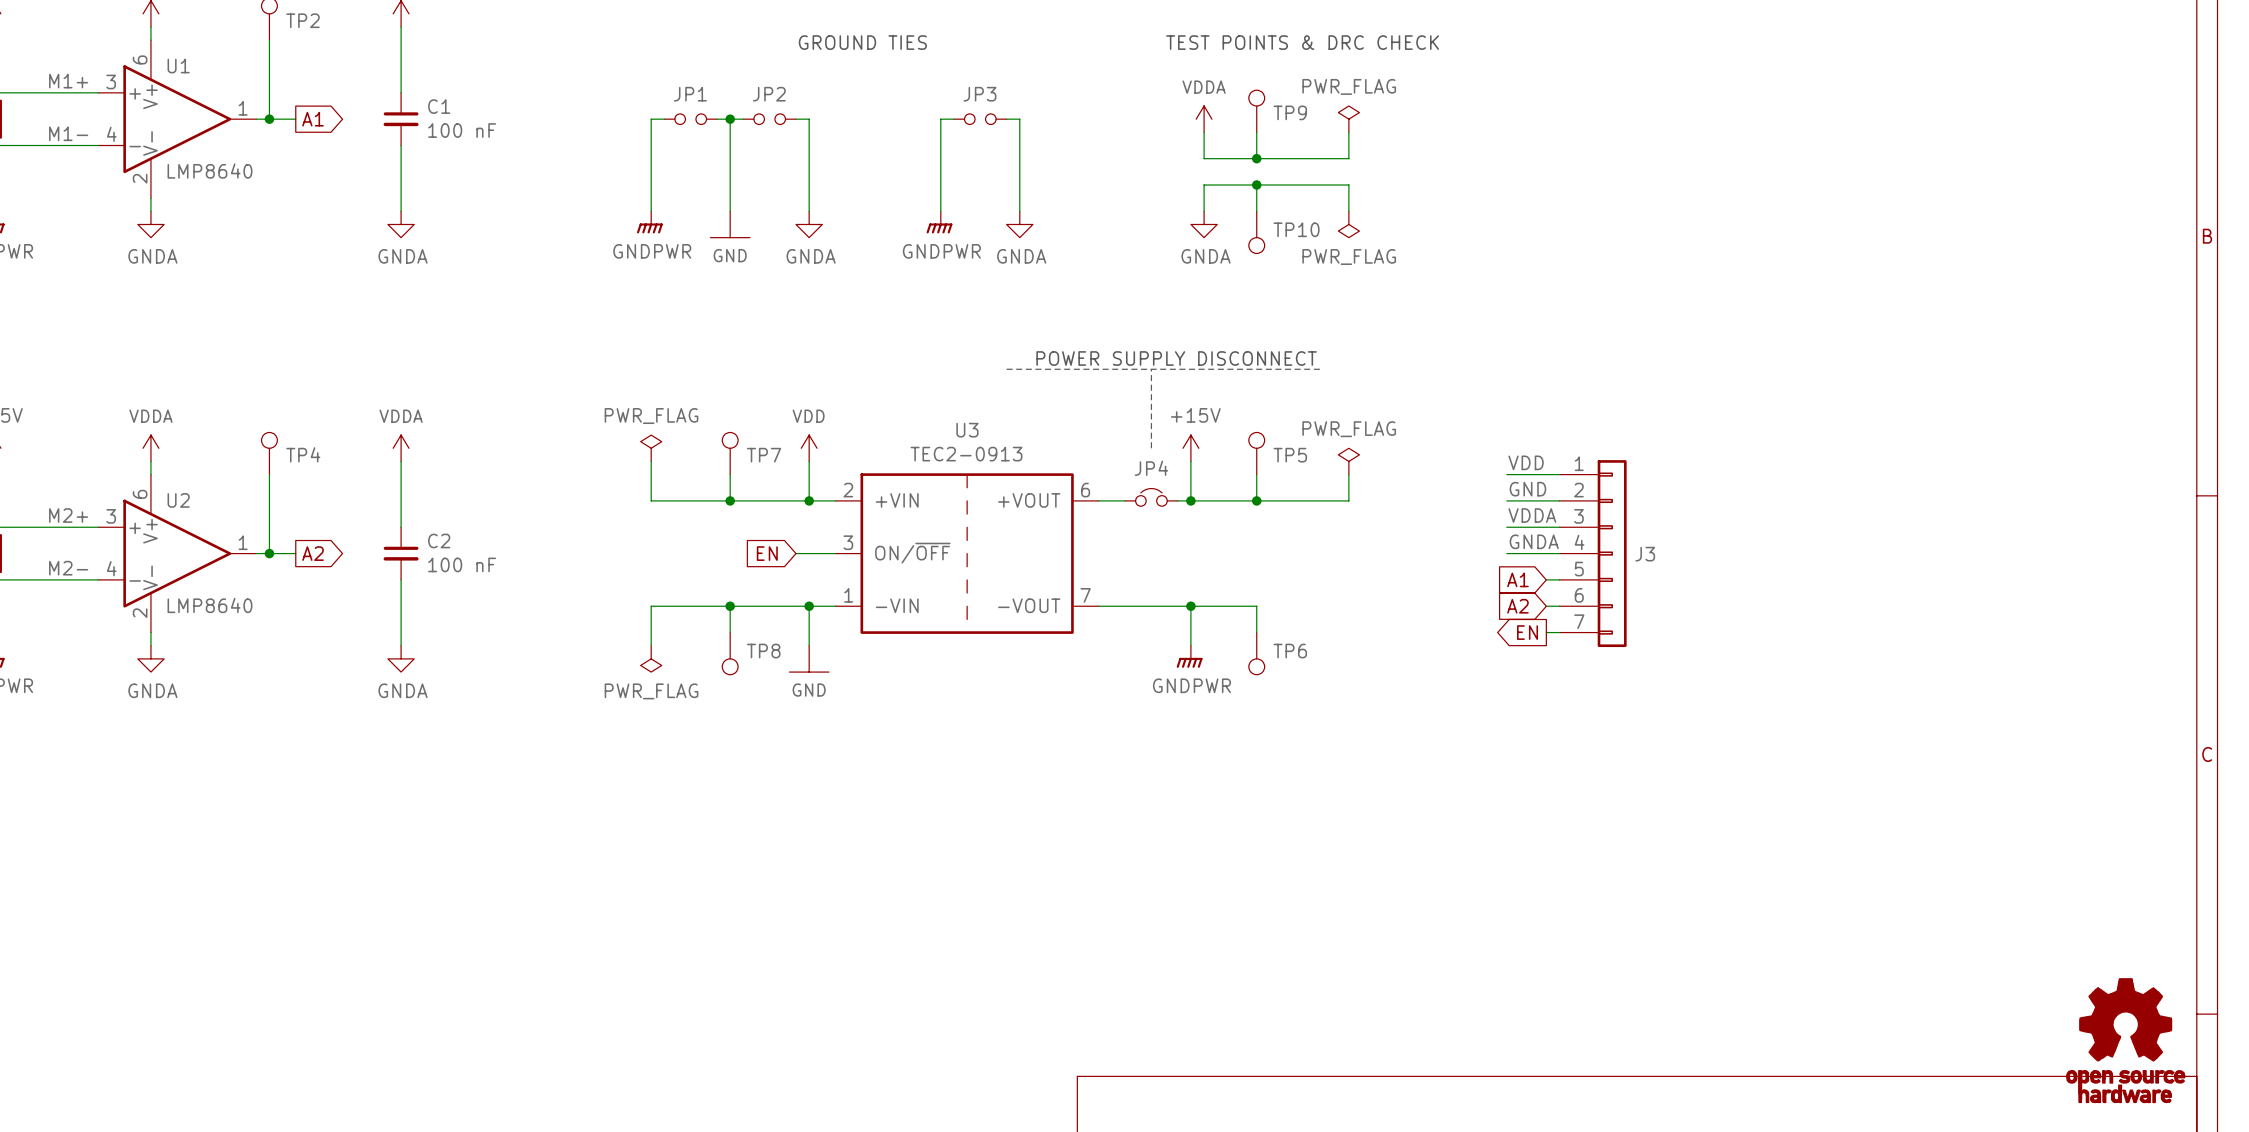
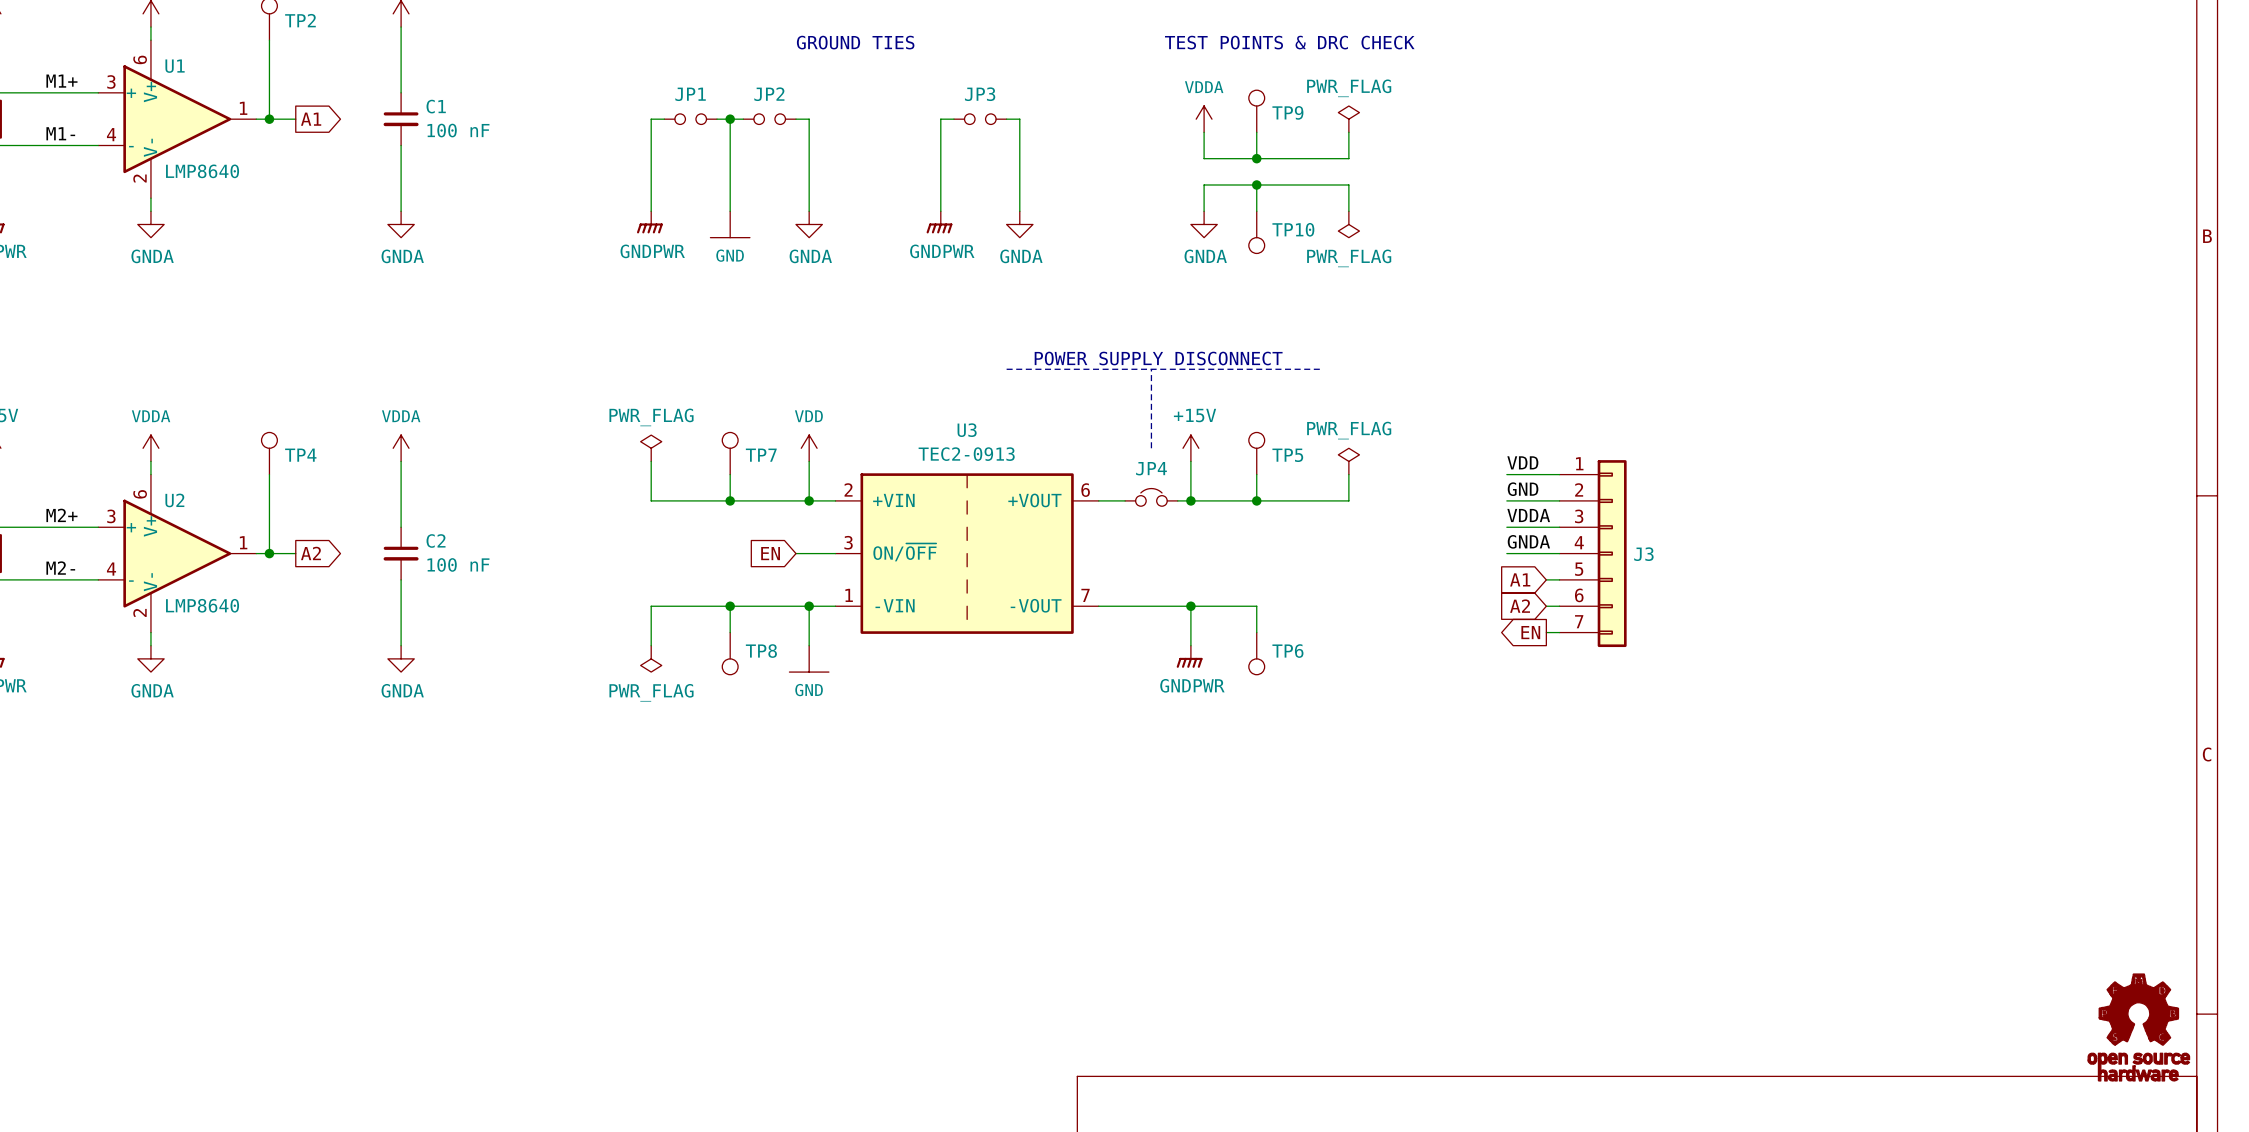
part: none -> (2138, 1027)
part: (2125, 1040) -> none

